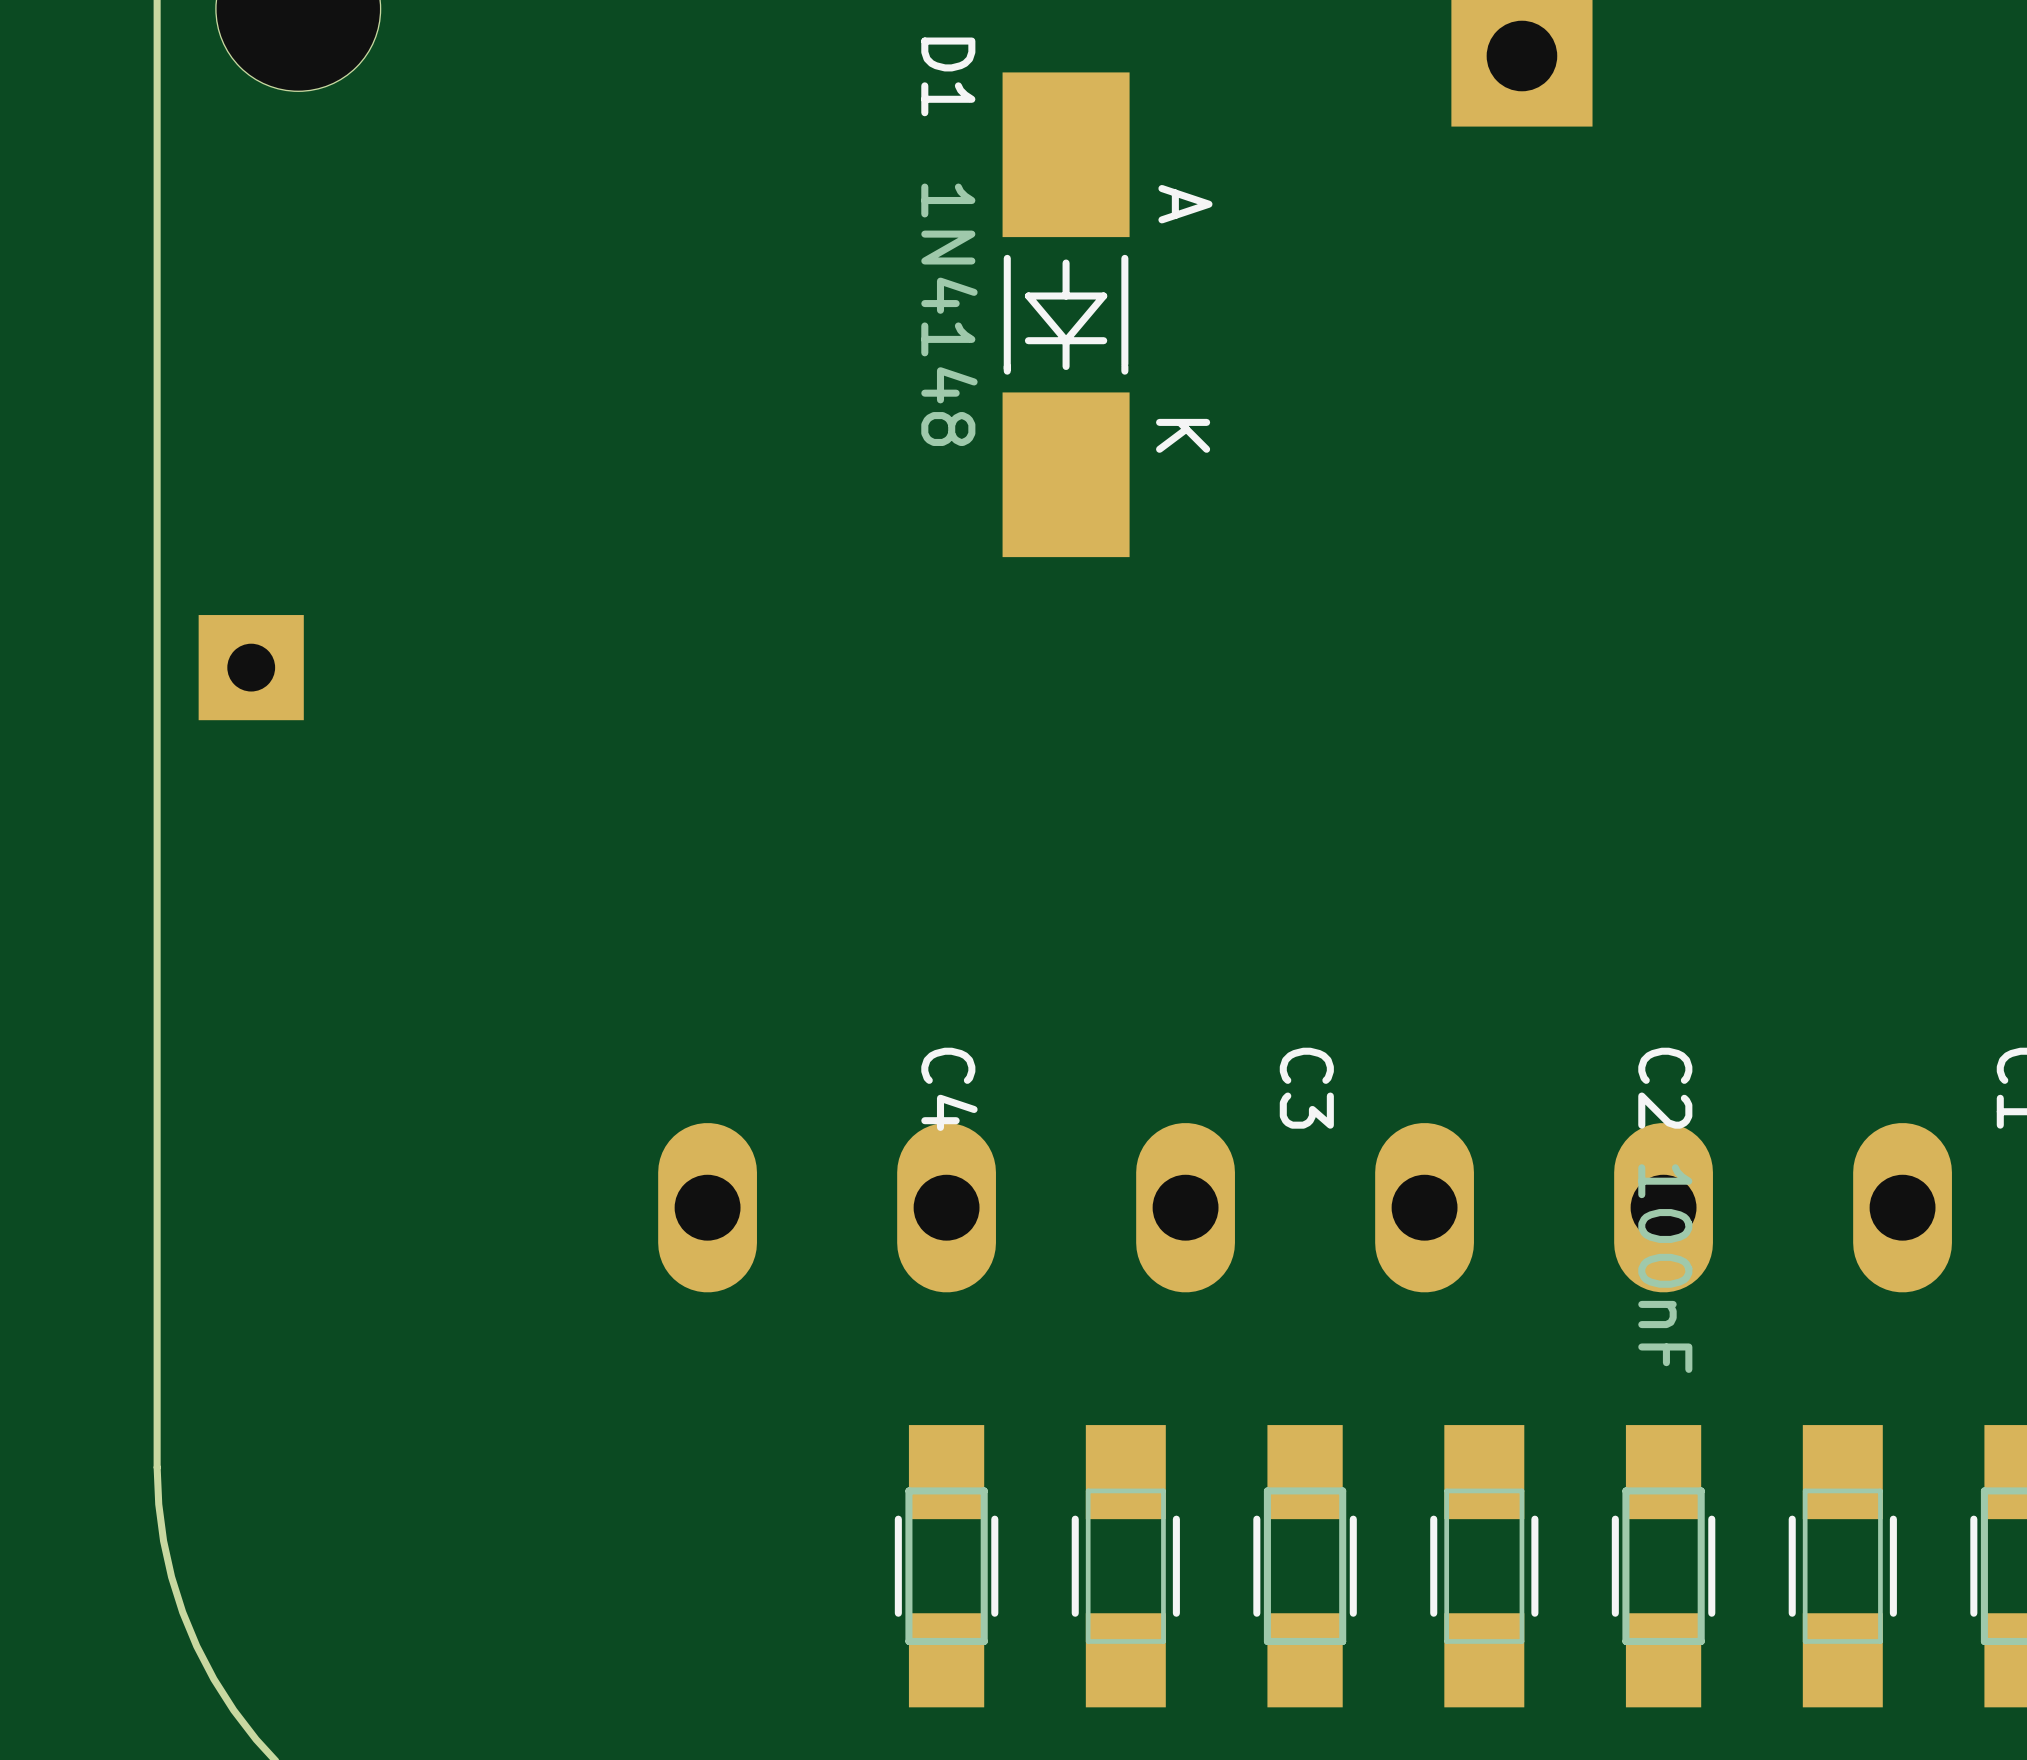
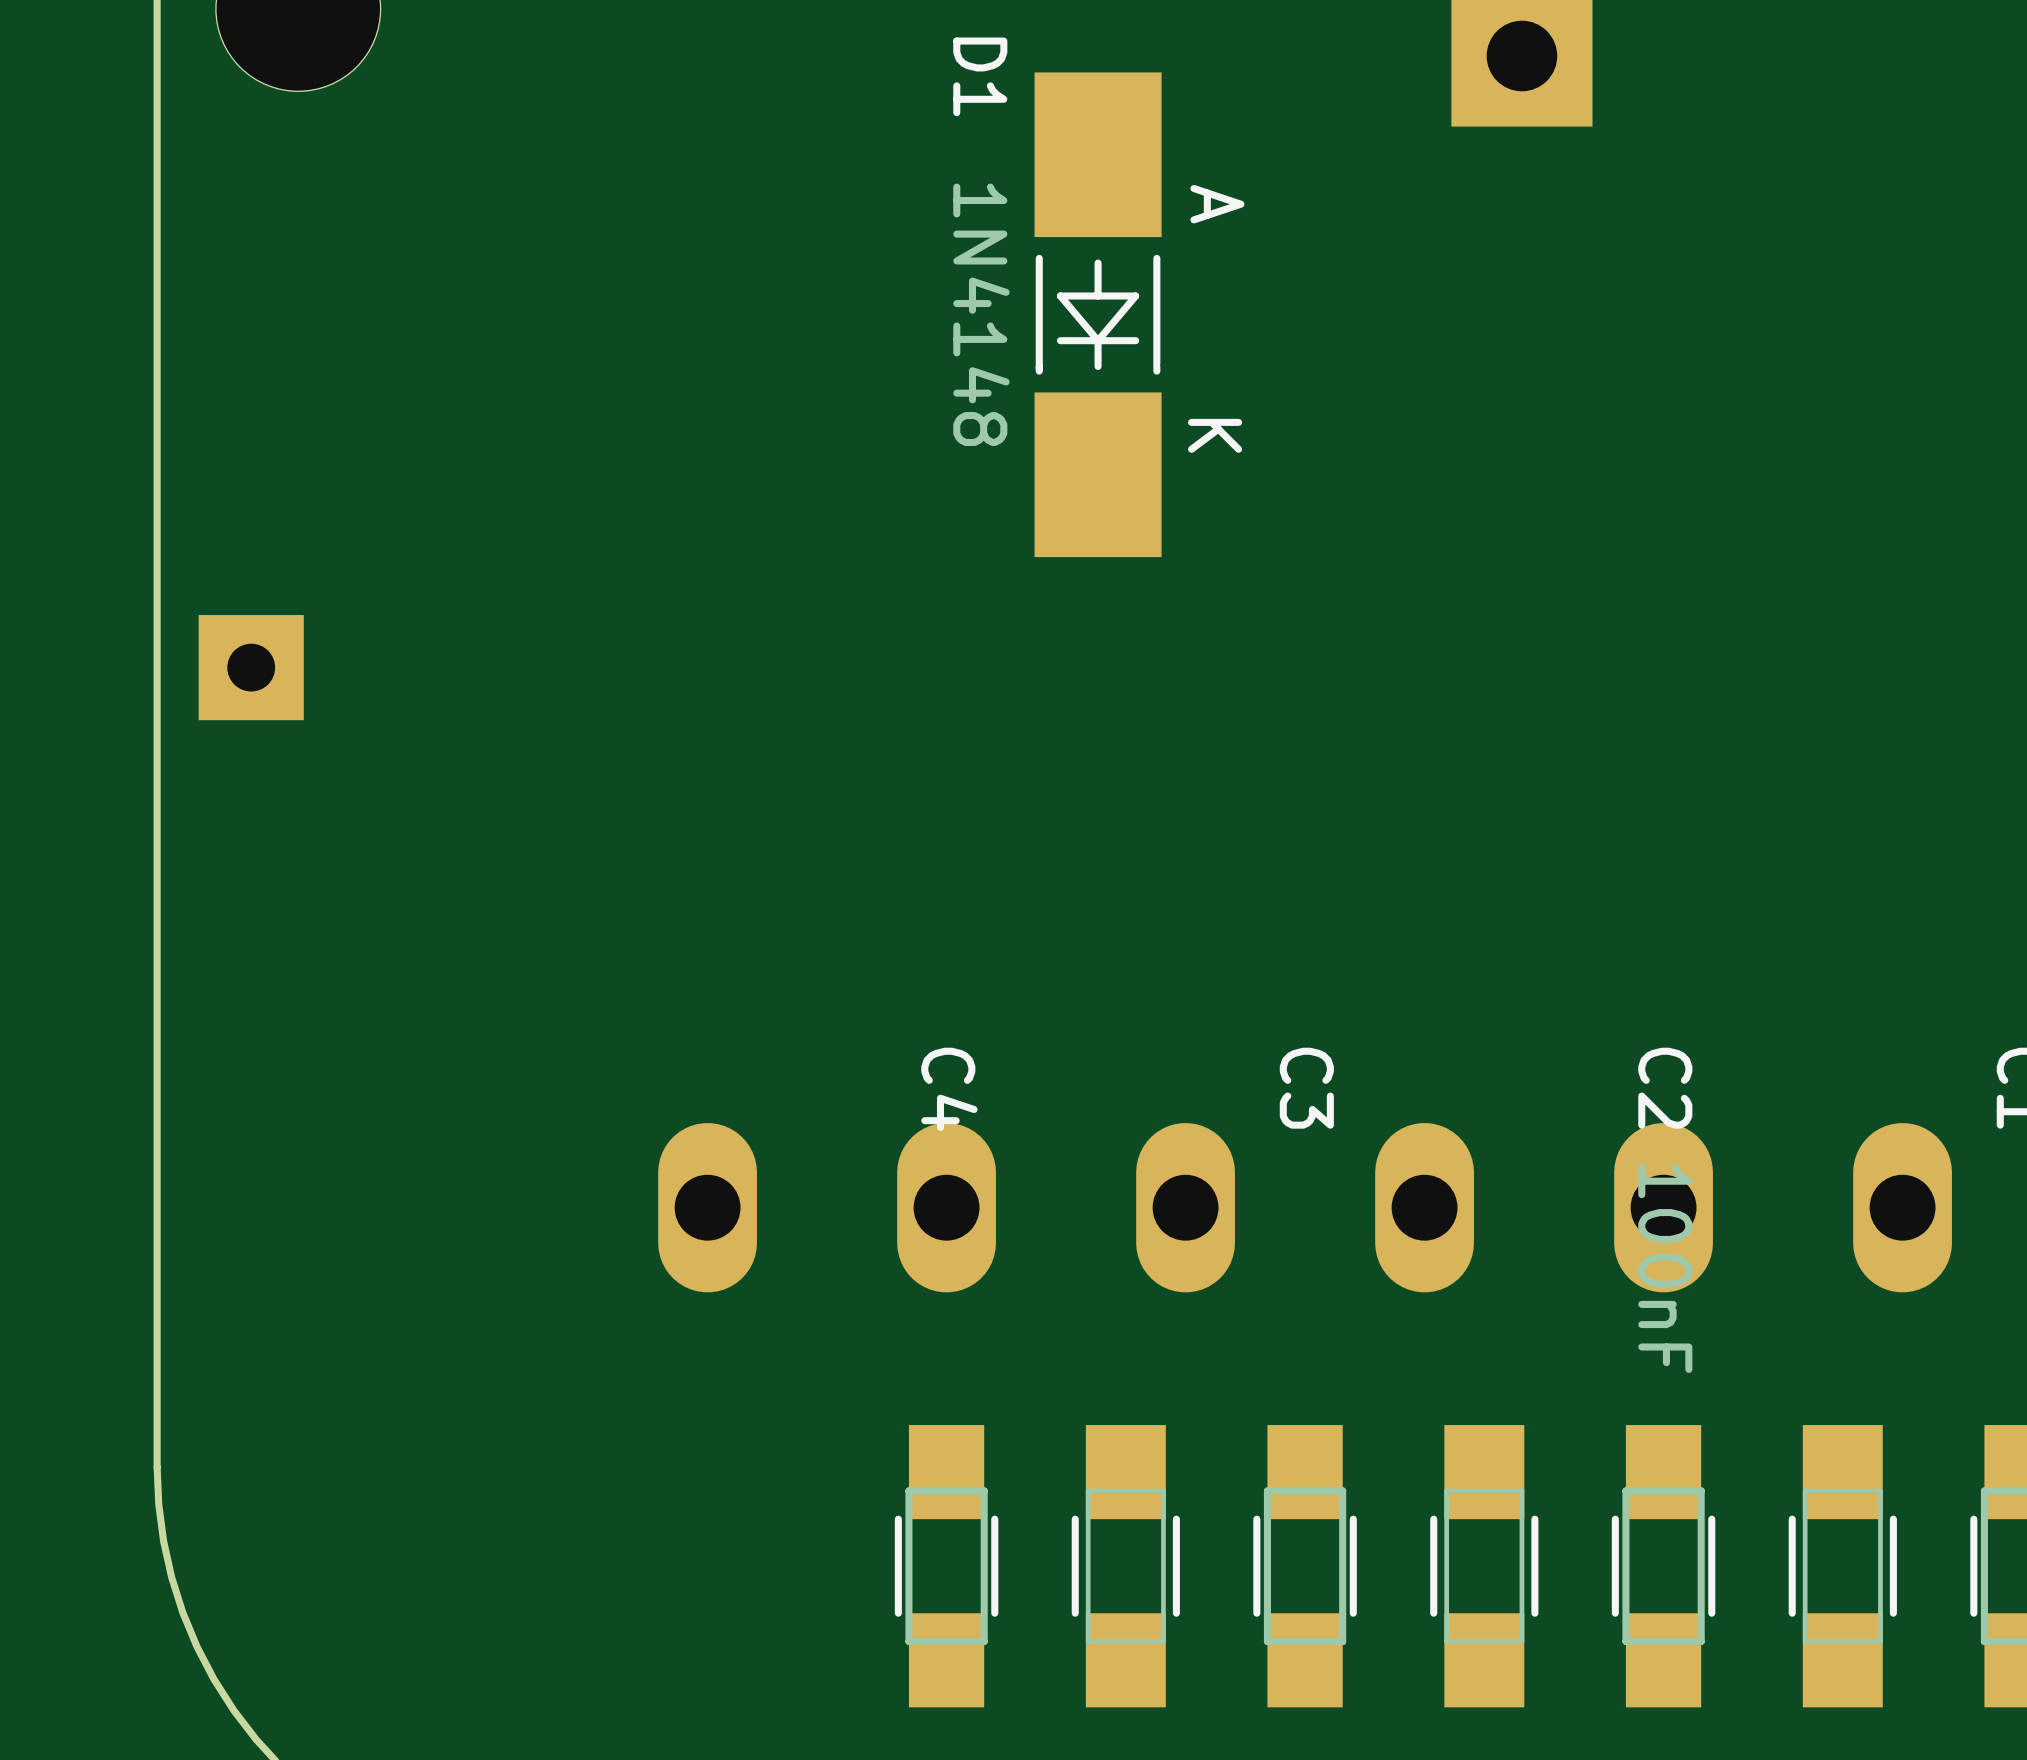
D1 position: (1066, 314) -> (1098, 314)

